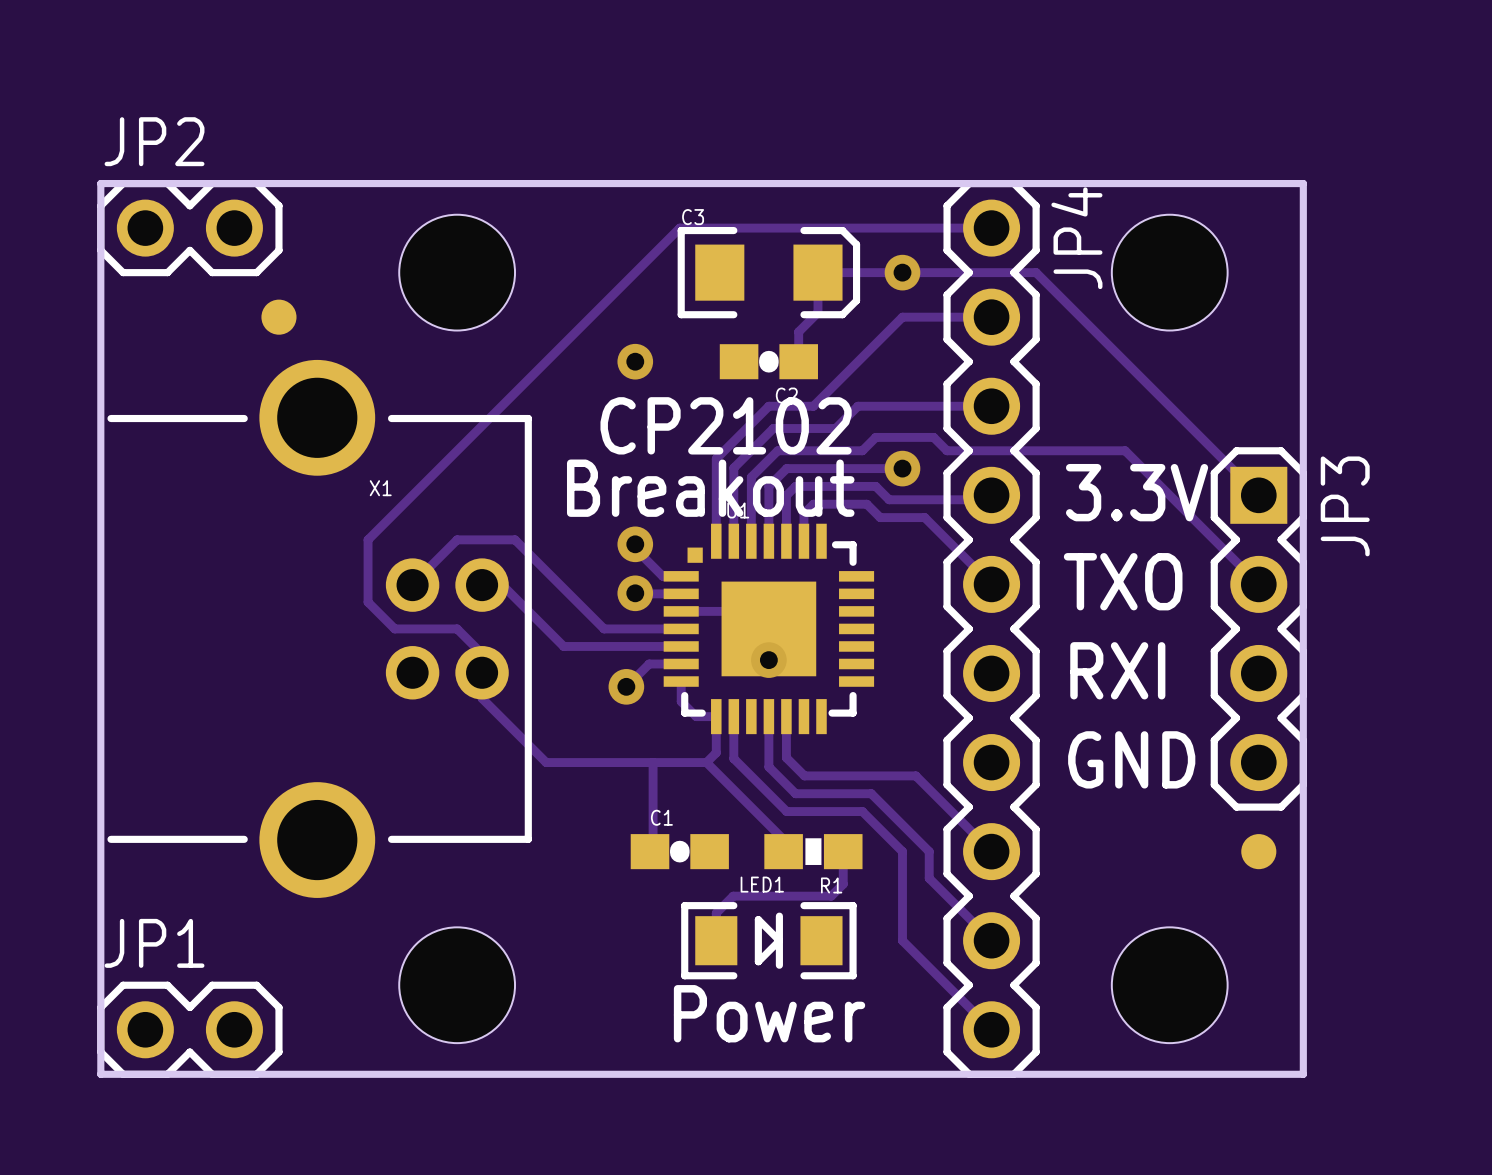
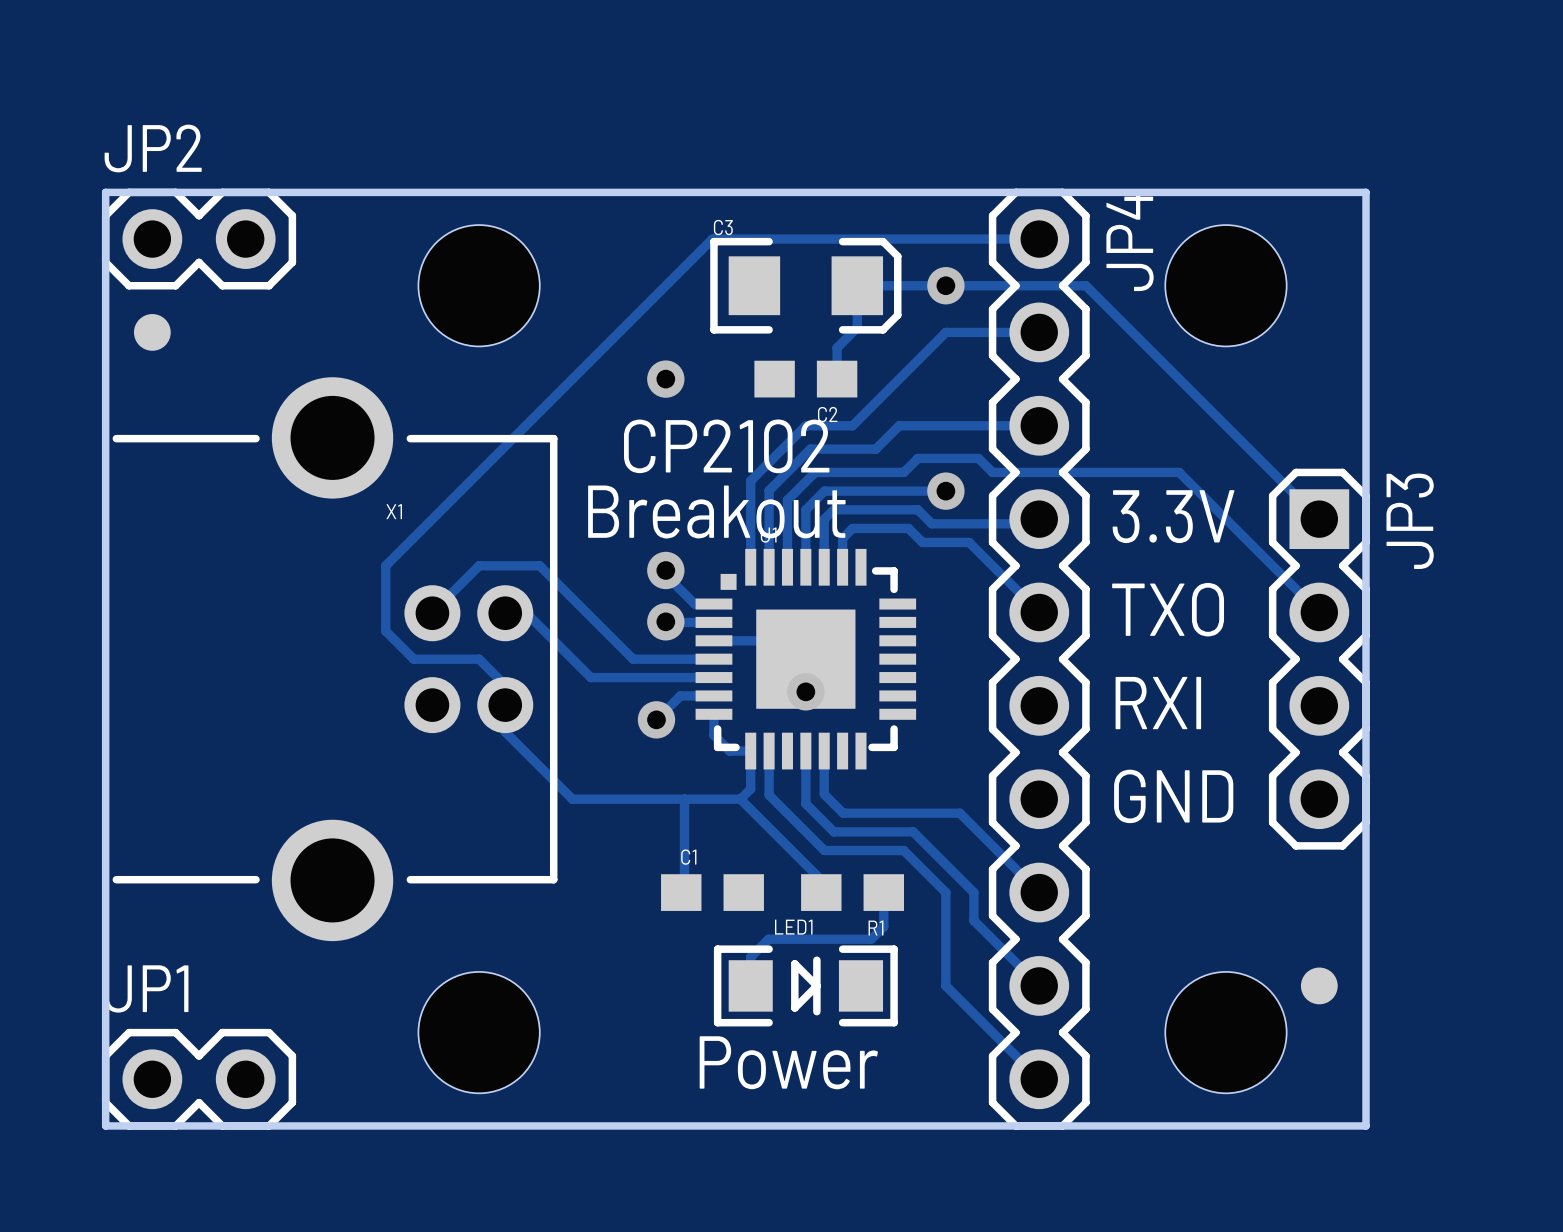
part position: (278, 317) -> (152, 332)
C2 footprint: [719, 344, 818, 380] -> [754, 360, 858, 398]
C1 footprint: [630, 834, 729, 870] -> [661, 874, 764, 911]
R1 footprint: [764, 834, 863, 870] -> [801, 874, 904, 911]
part position: (1258, 851) -> (1319, 985)

